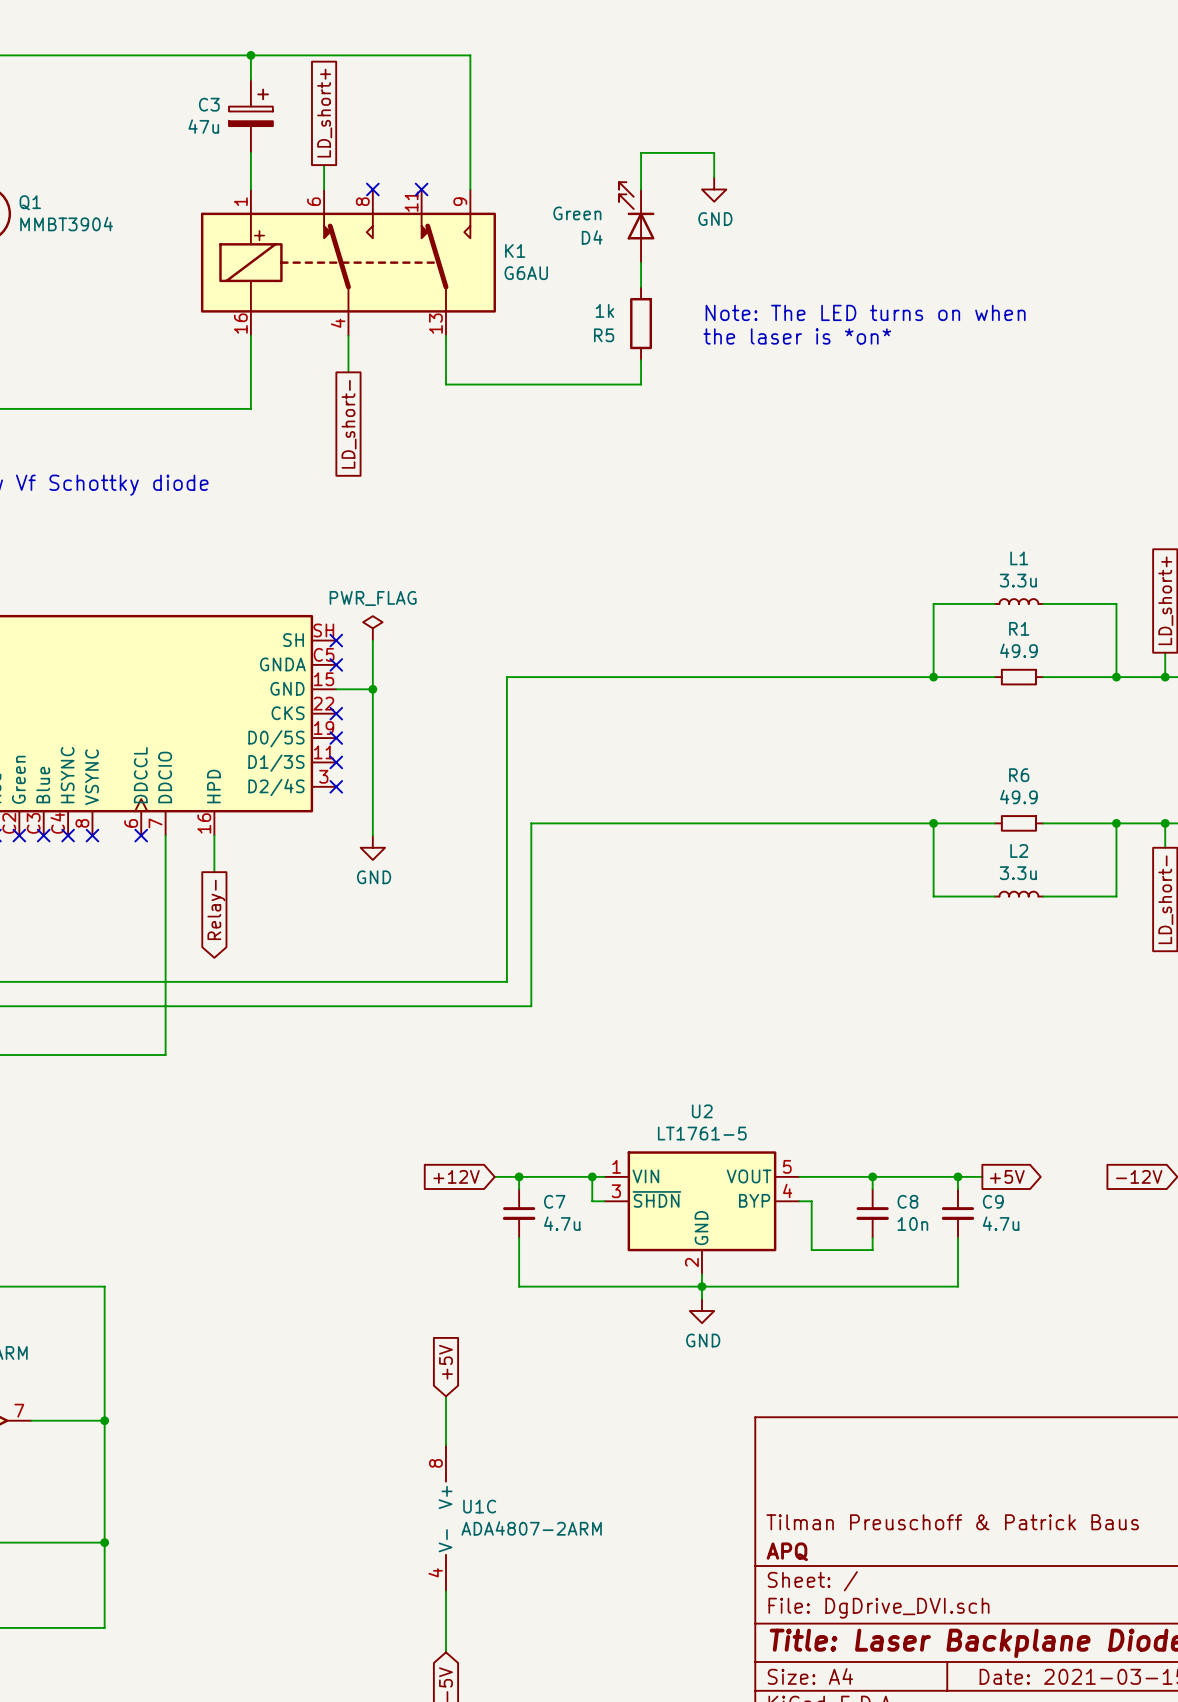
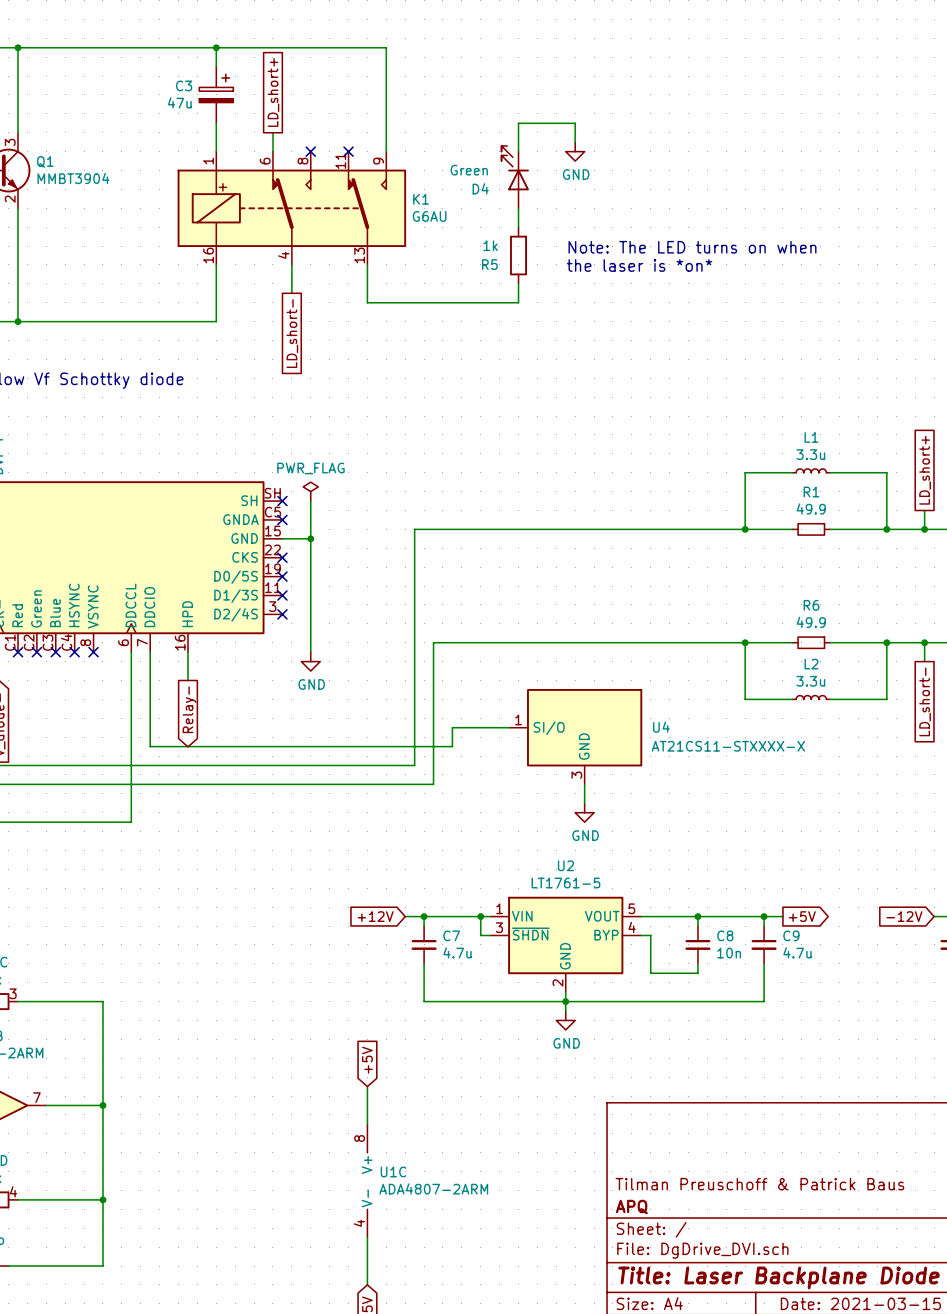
no-connect mark: (141, 835) -> none
wire: none -> (509, 727) (452, 727) (452, 746) (150, 746)
U4: none -> AT21CS11-STXXXX-X (575, 736)
wire: (165, 957) (165, 1055) (141, 1055) -> (131, 652) (131, 822)
wire: none -> (584, 784) (584, 803)
power symbol: none -> GND (584, 812)

